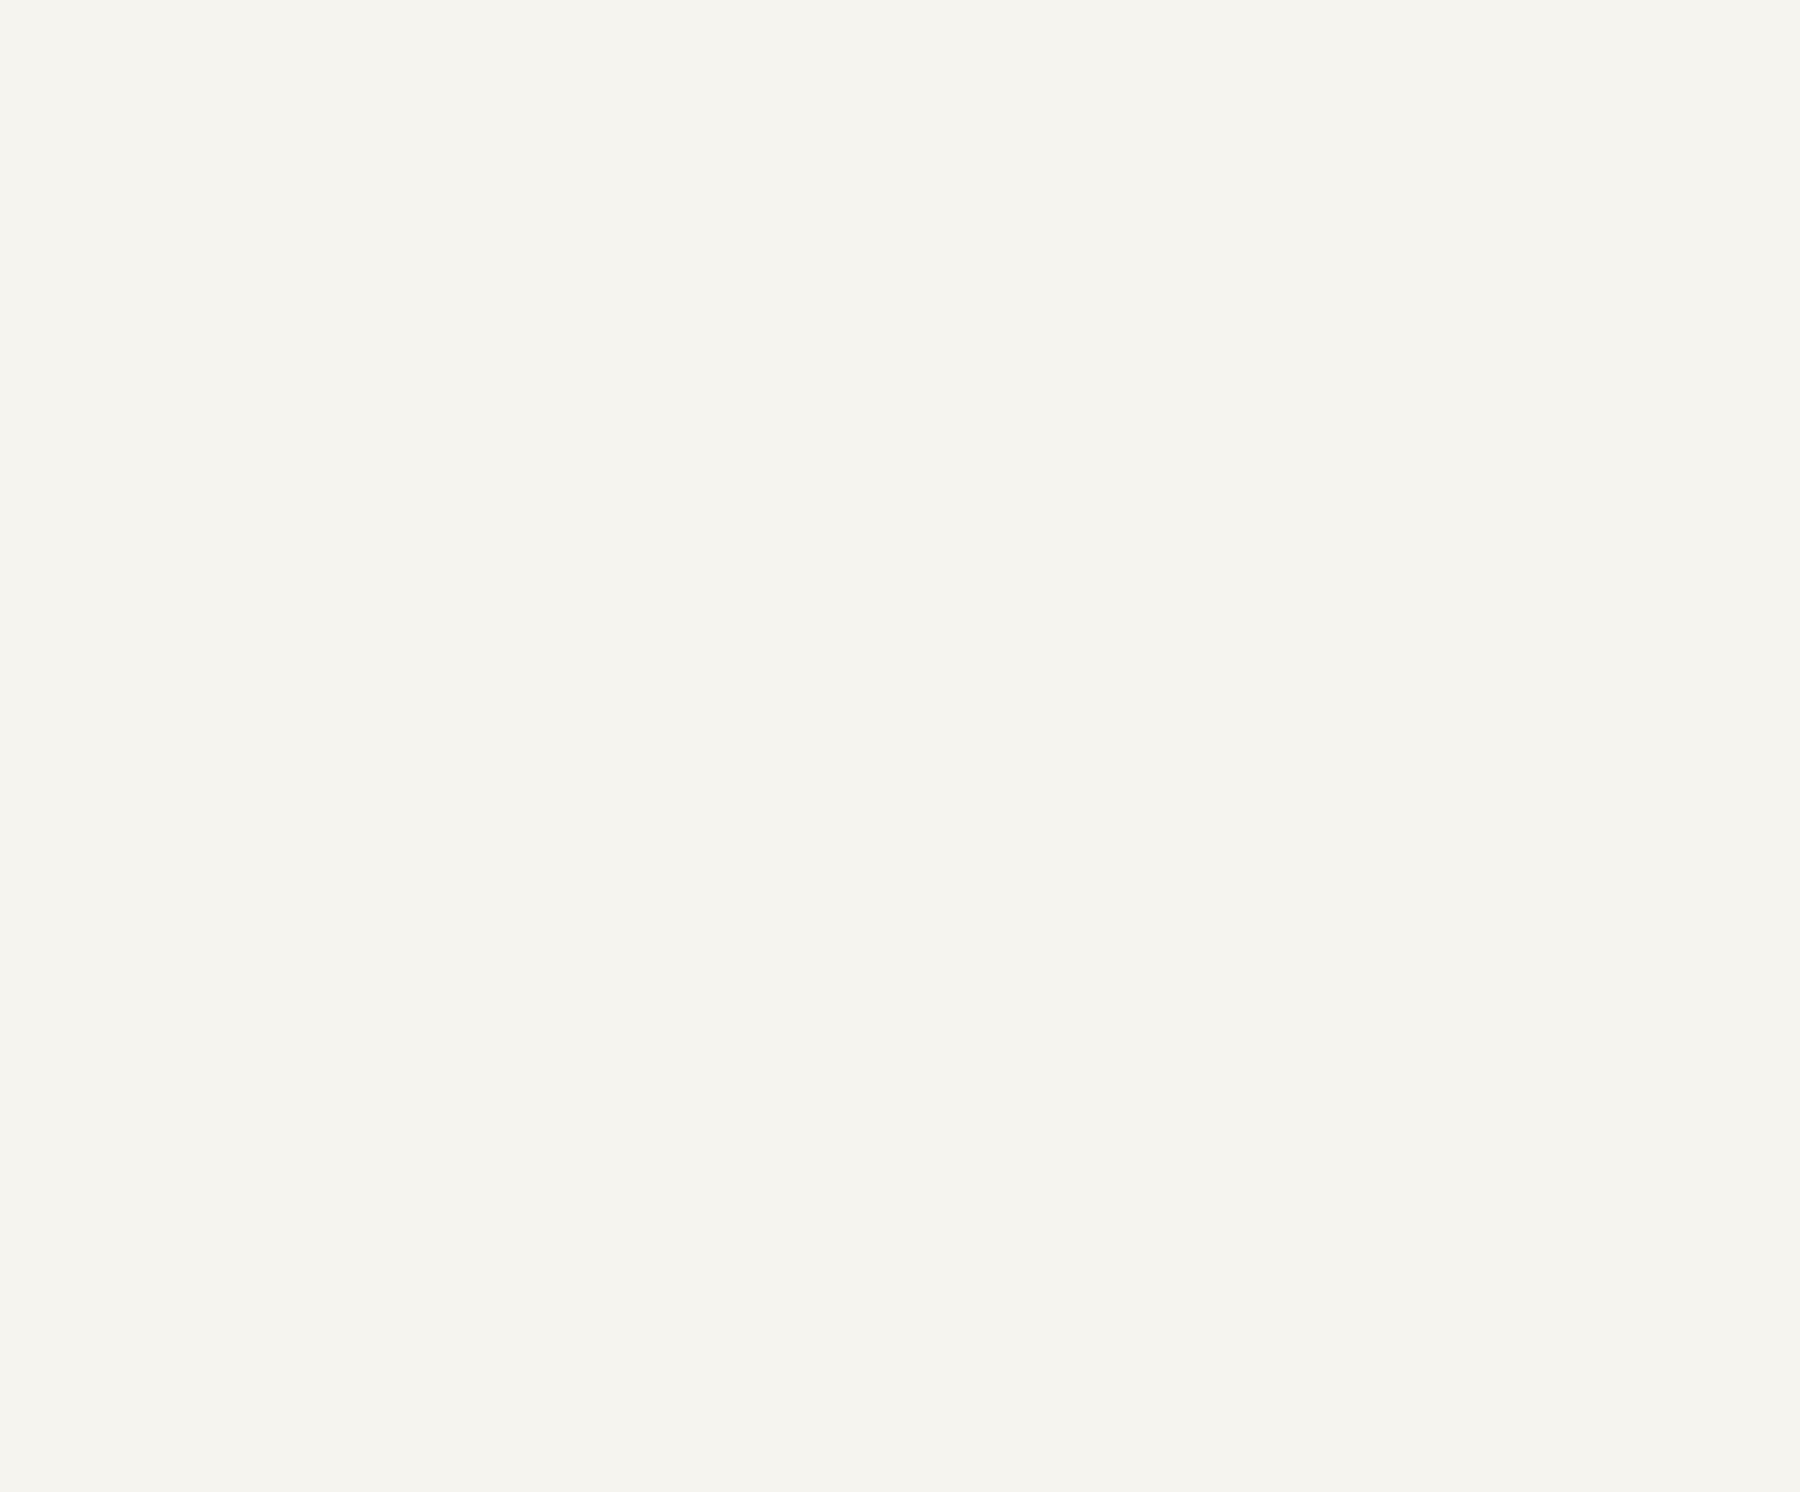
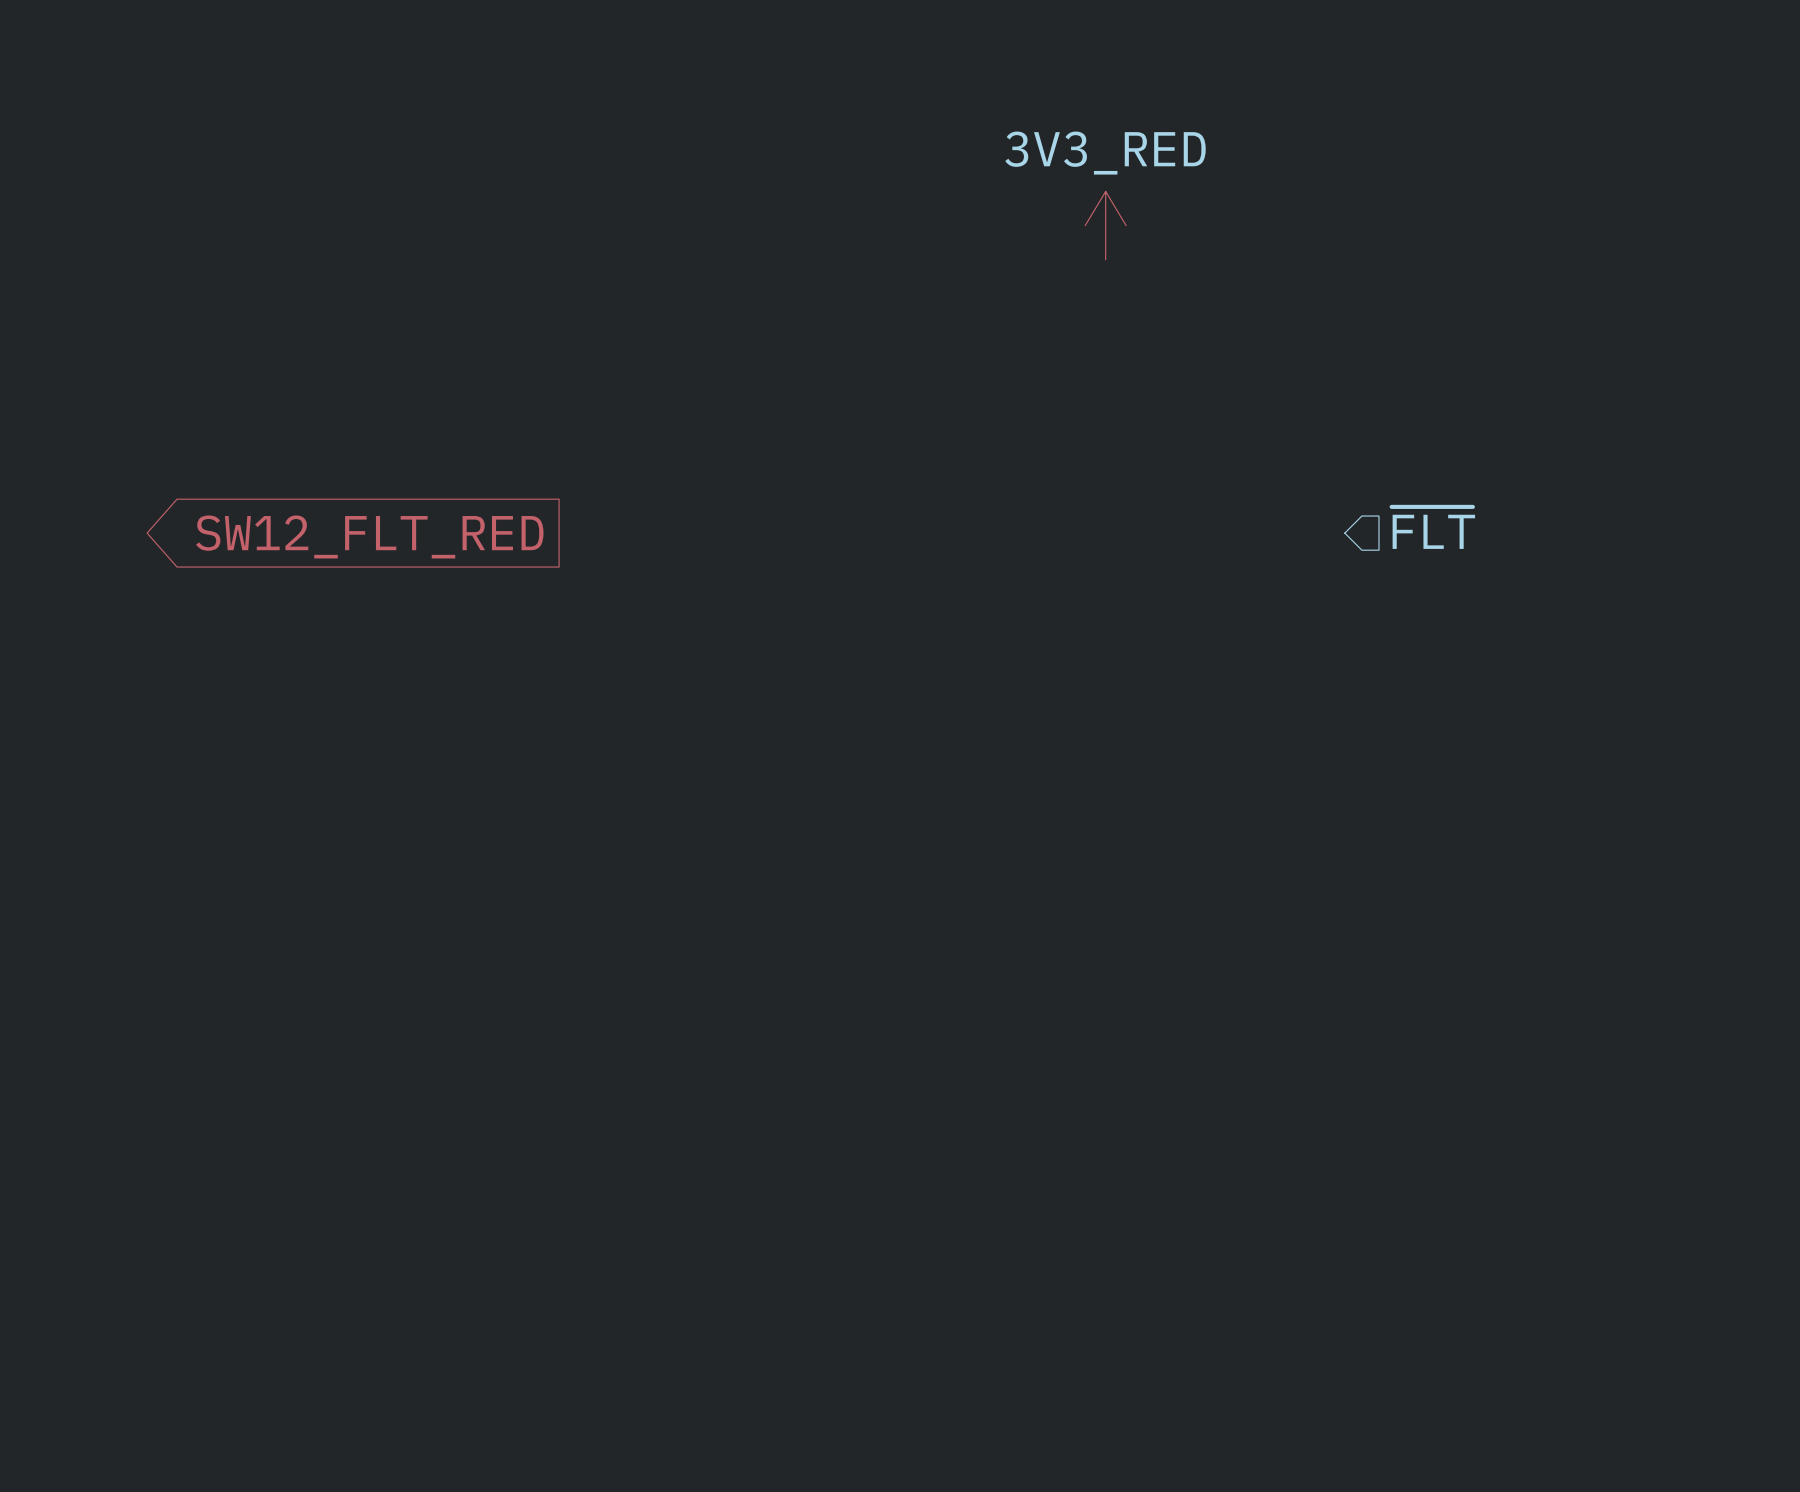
power symbol: none -> 3V3_RED (1105, 225)
sheet pin: none -> ~{FLT} (1433, 527)
global label: none -> SW12_FLT_RED (369, 536)

